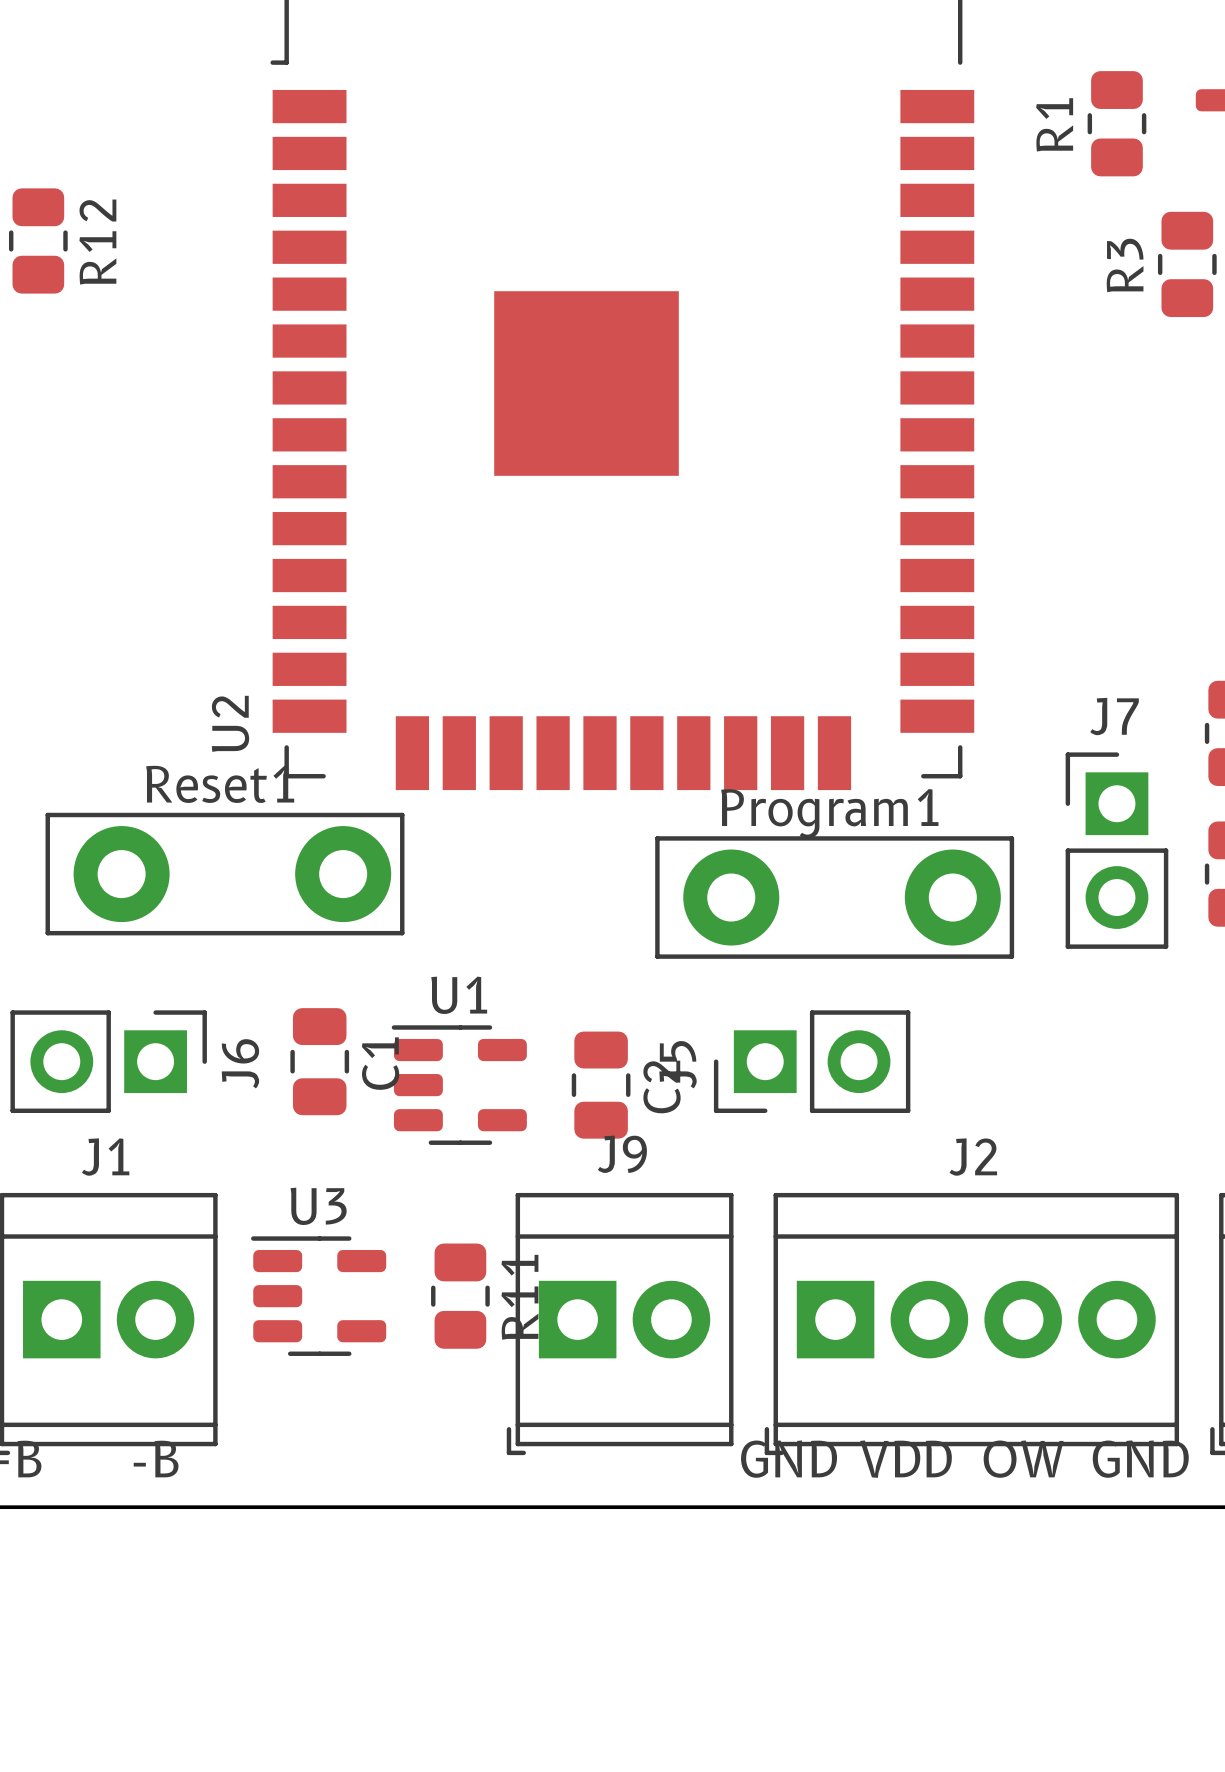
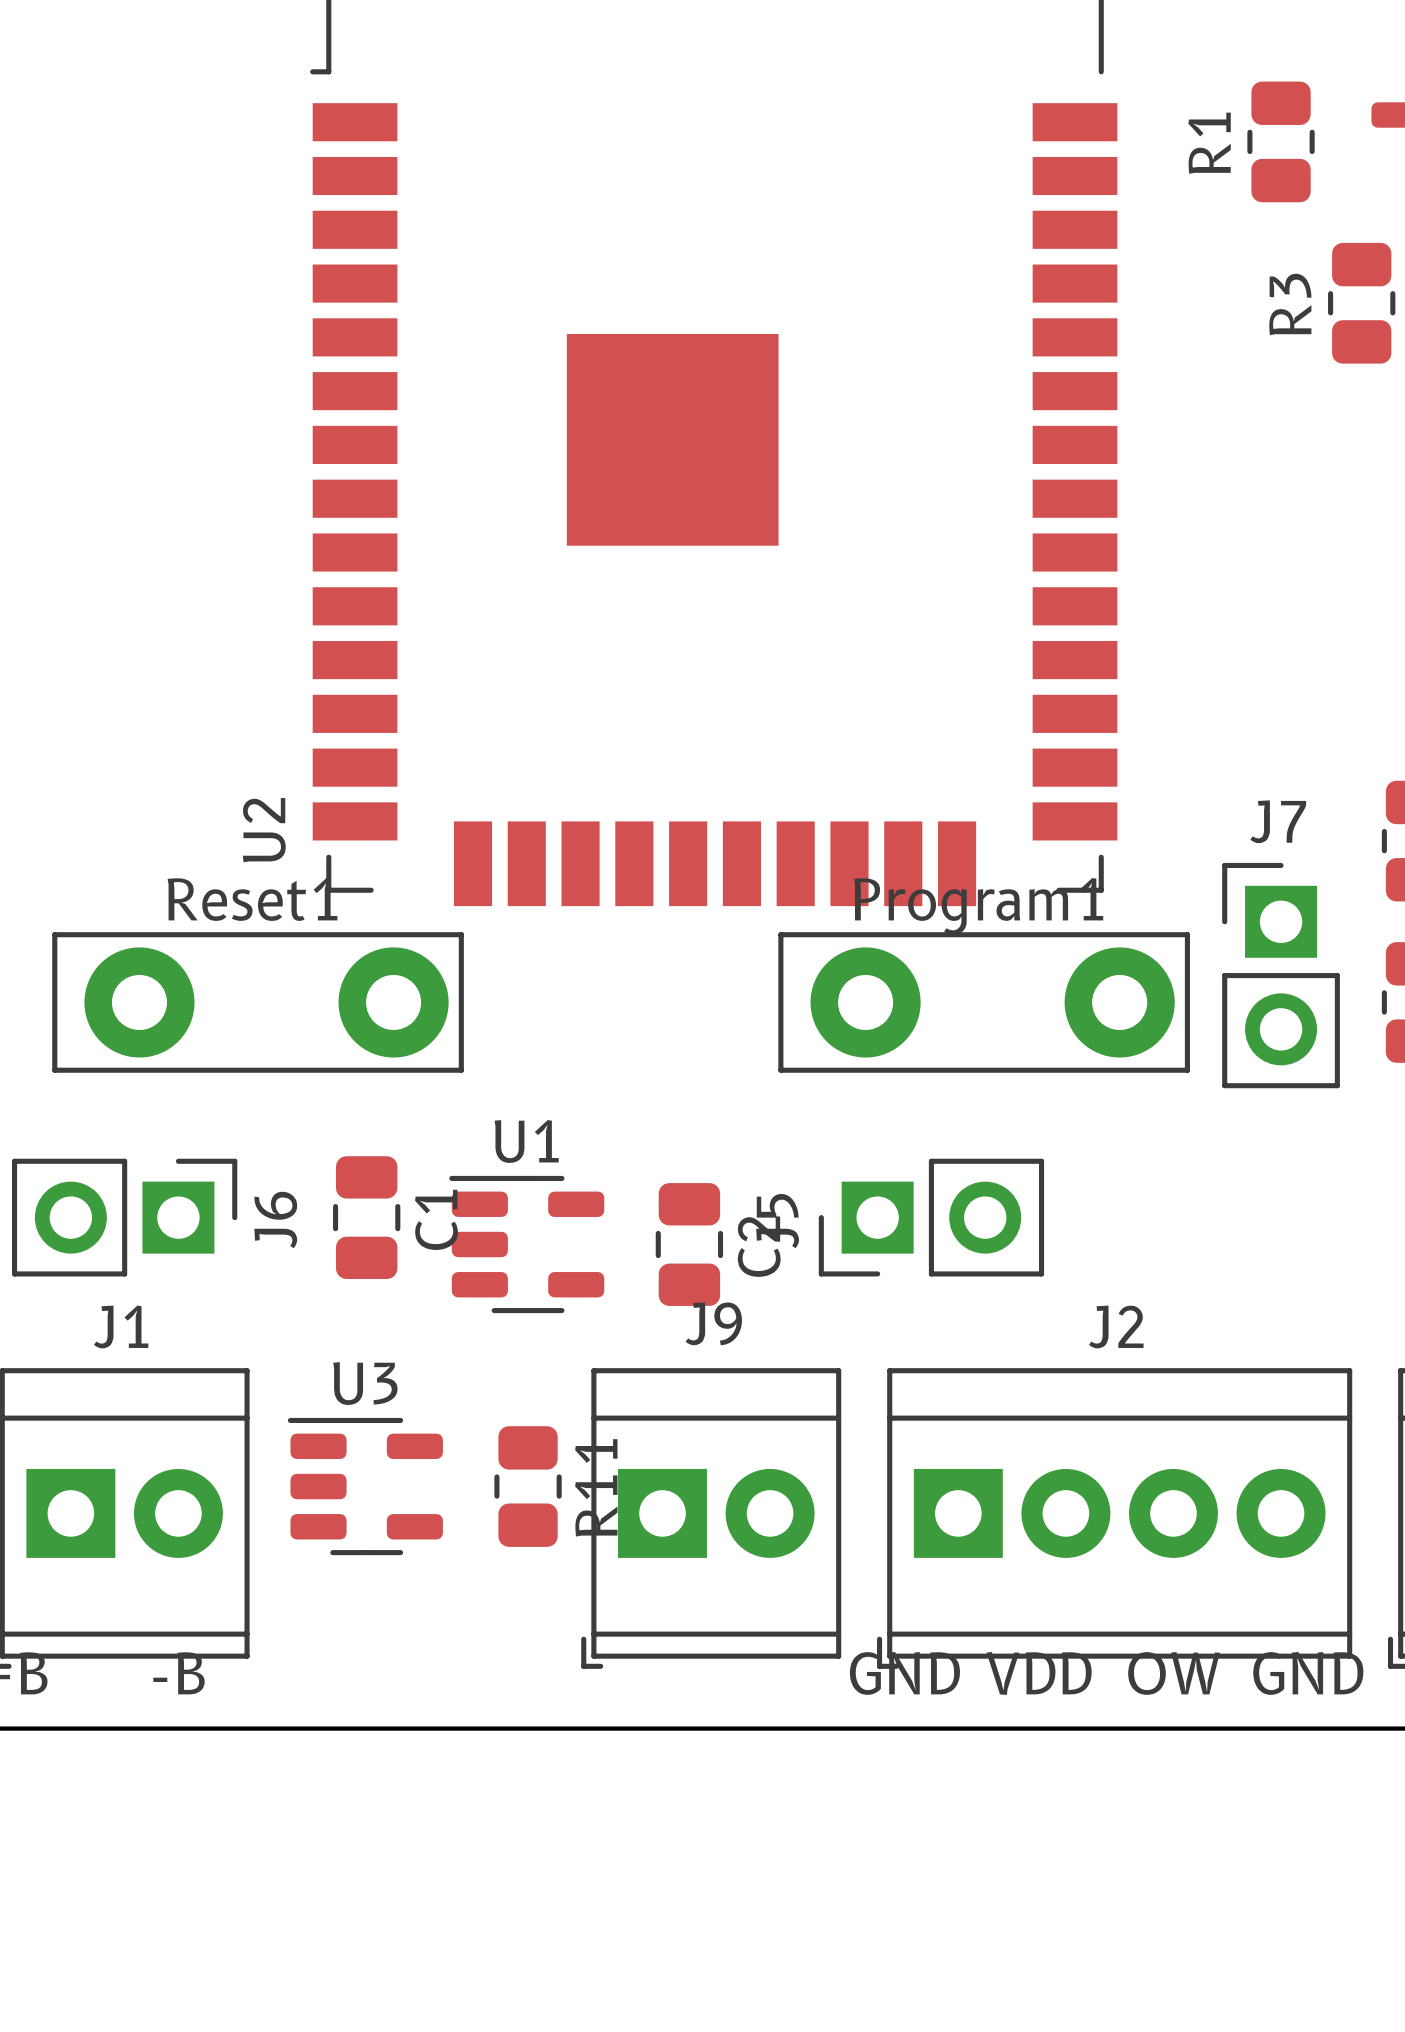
R12: (38, 240) -> none
Program1 position: (834, 897) -> (984, 1002)

